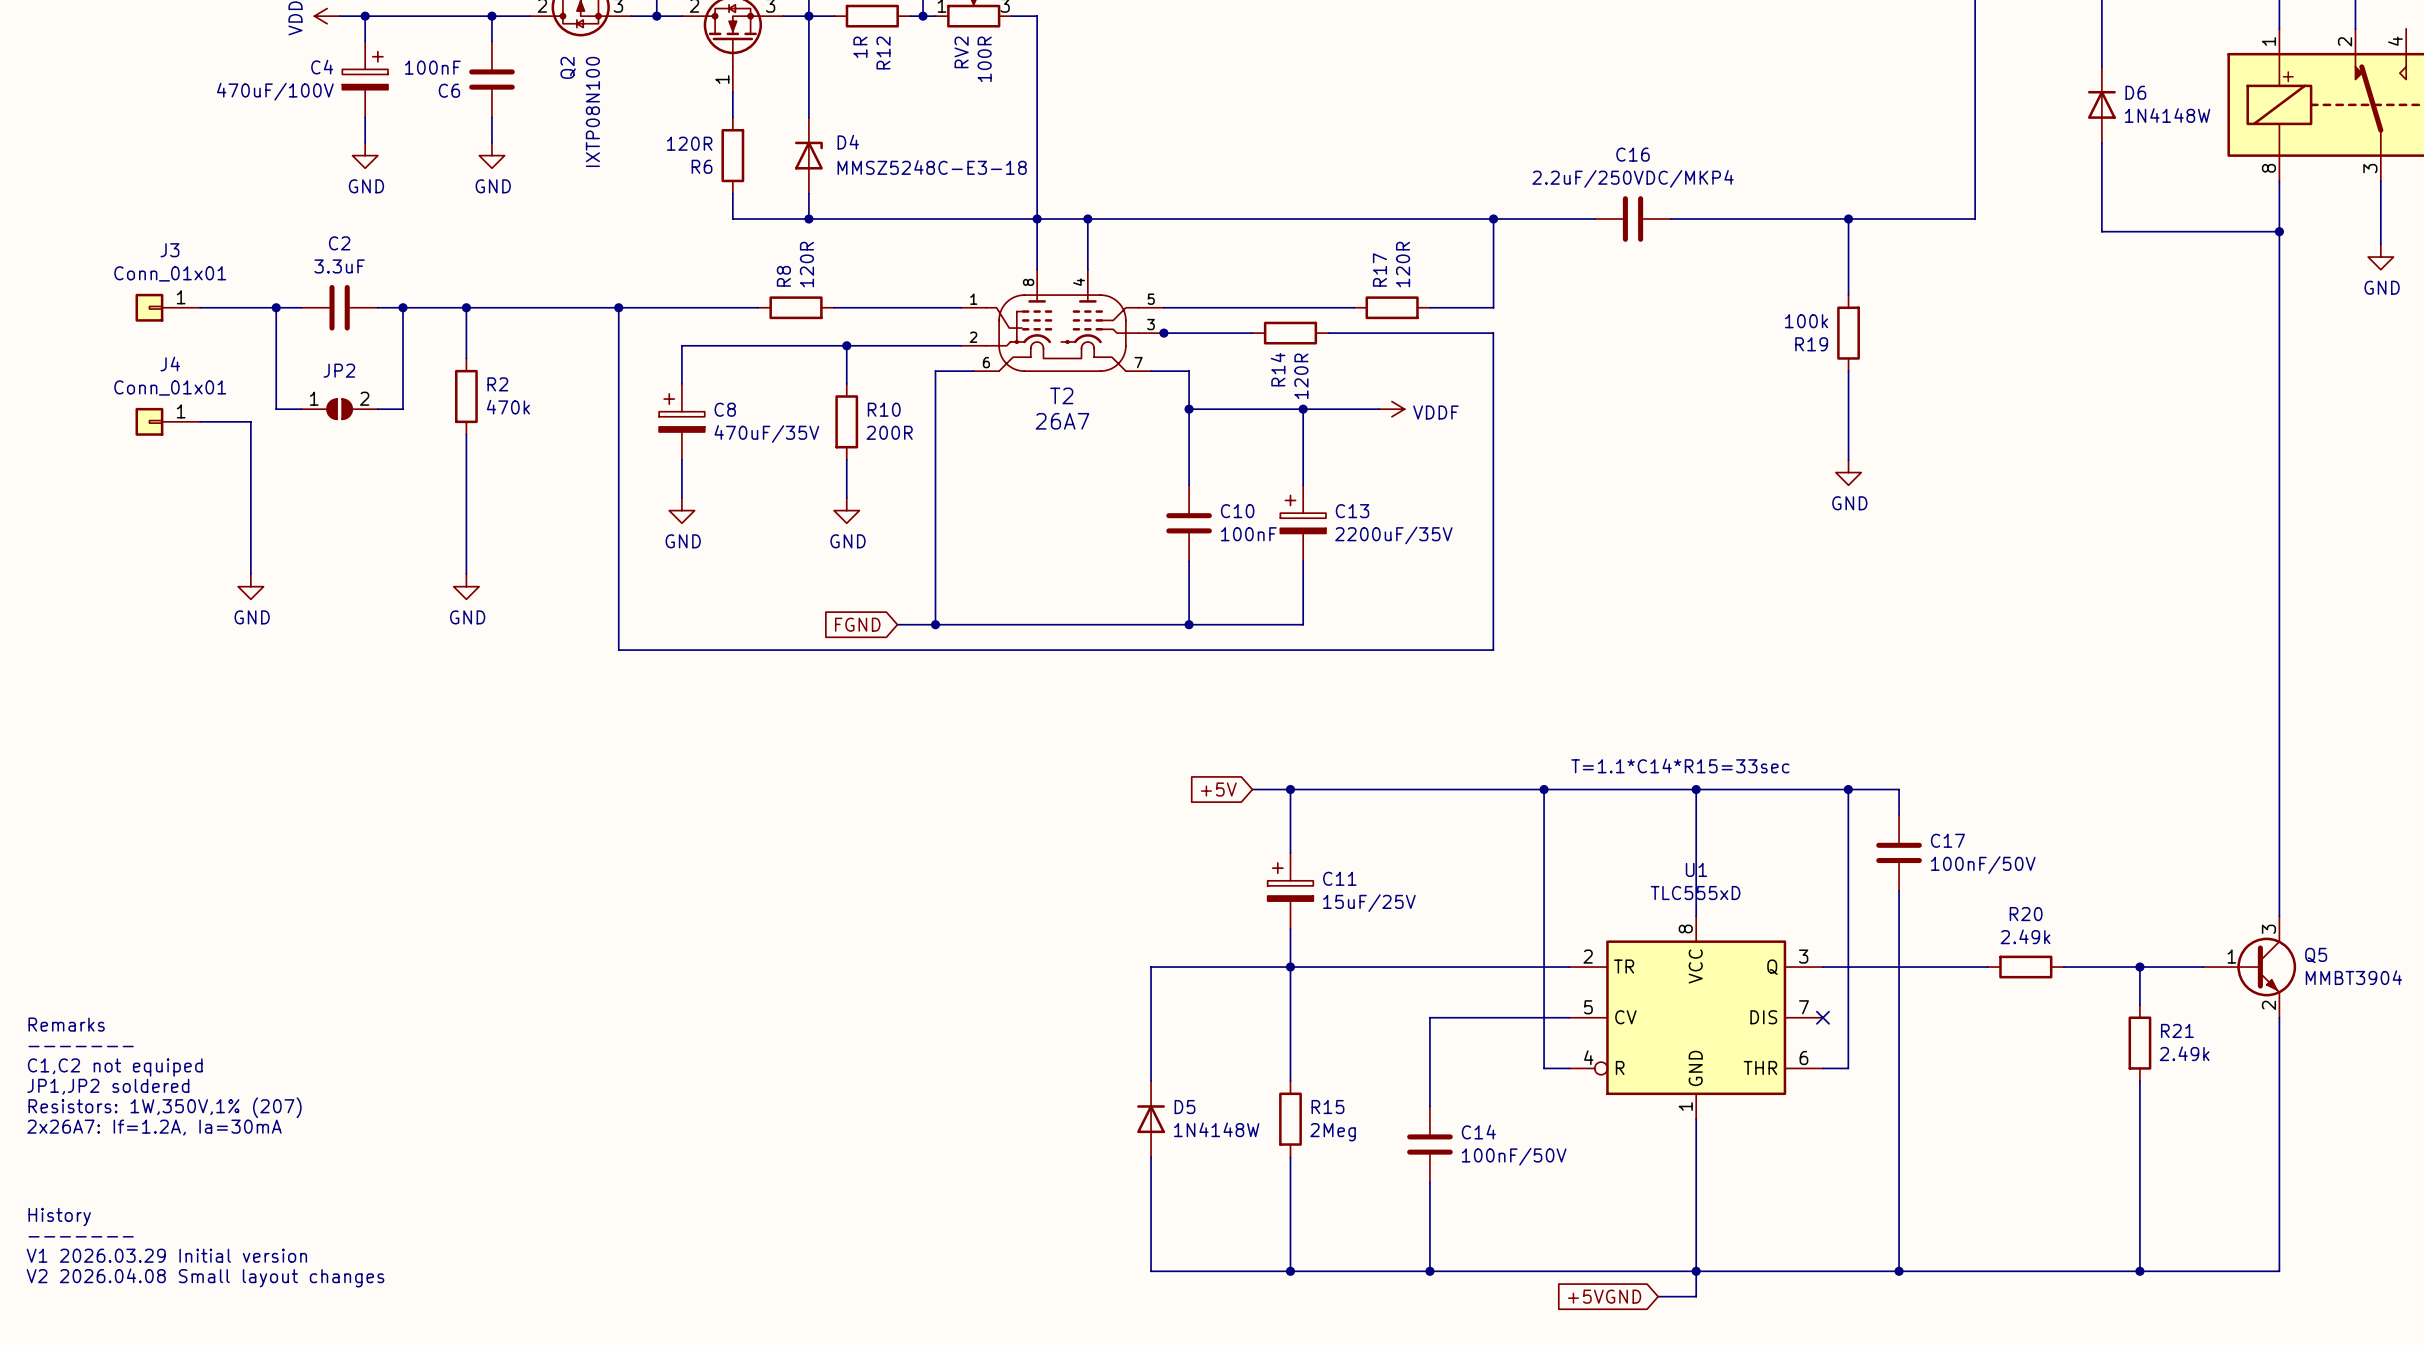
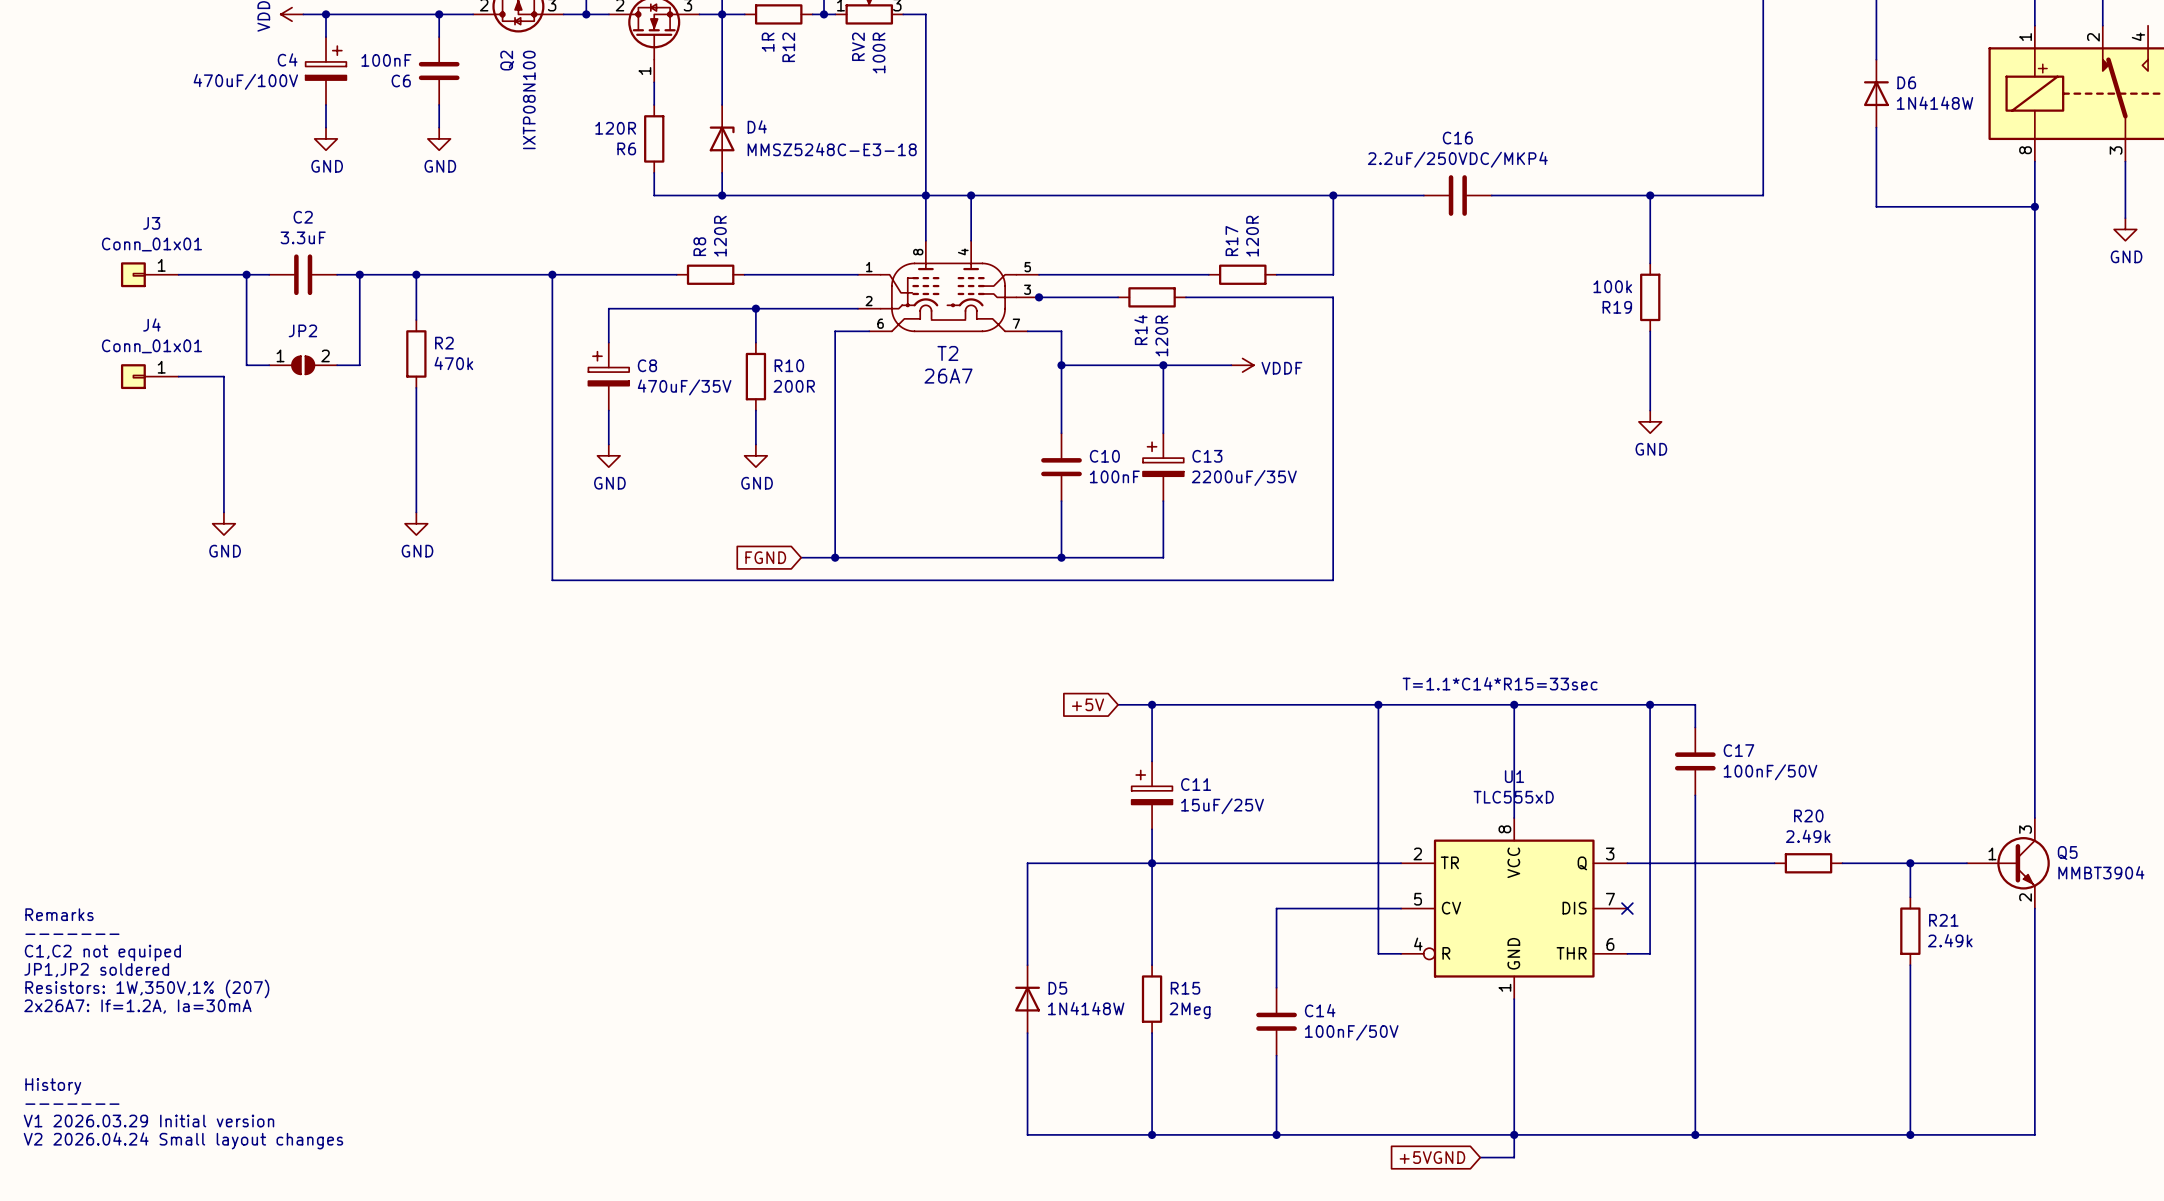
text: V2 2026.04.08 Small layout changes (205, 1277) -> V2 2026.04.24 Small layout changes (183, 1140)

